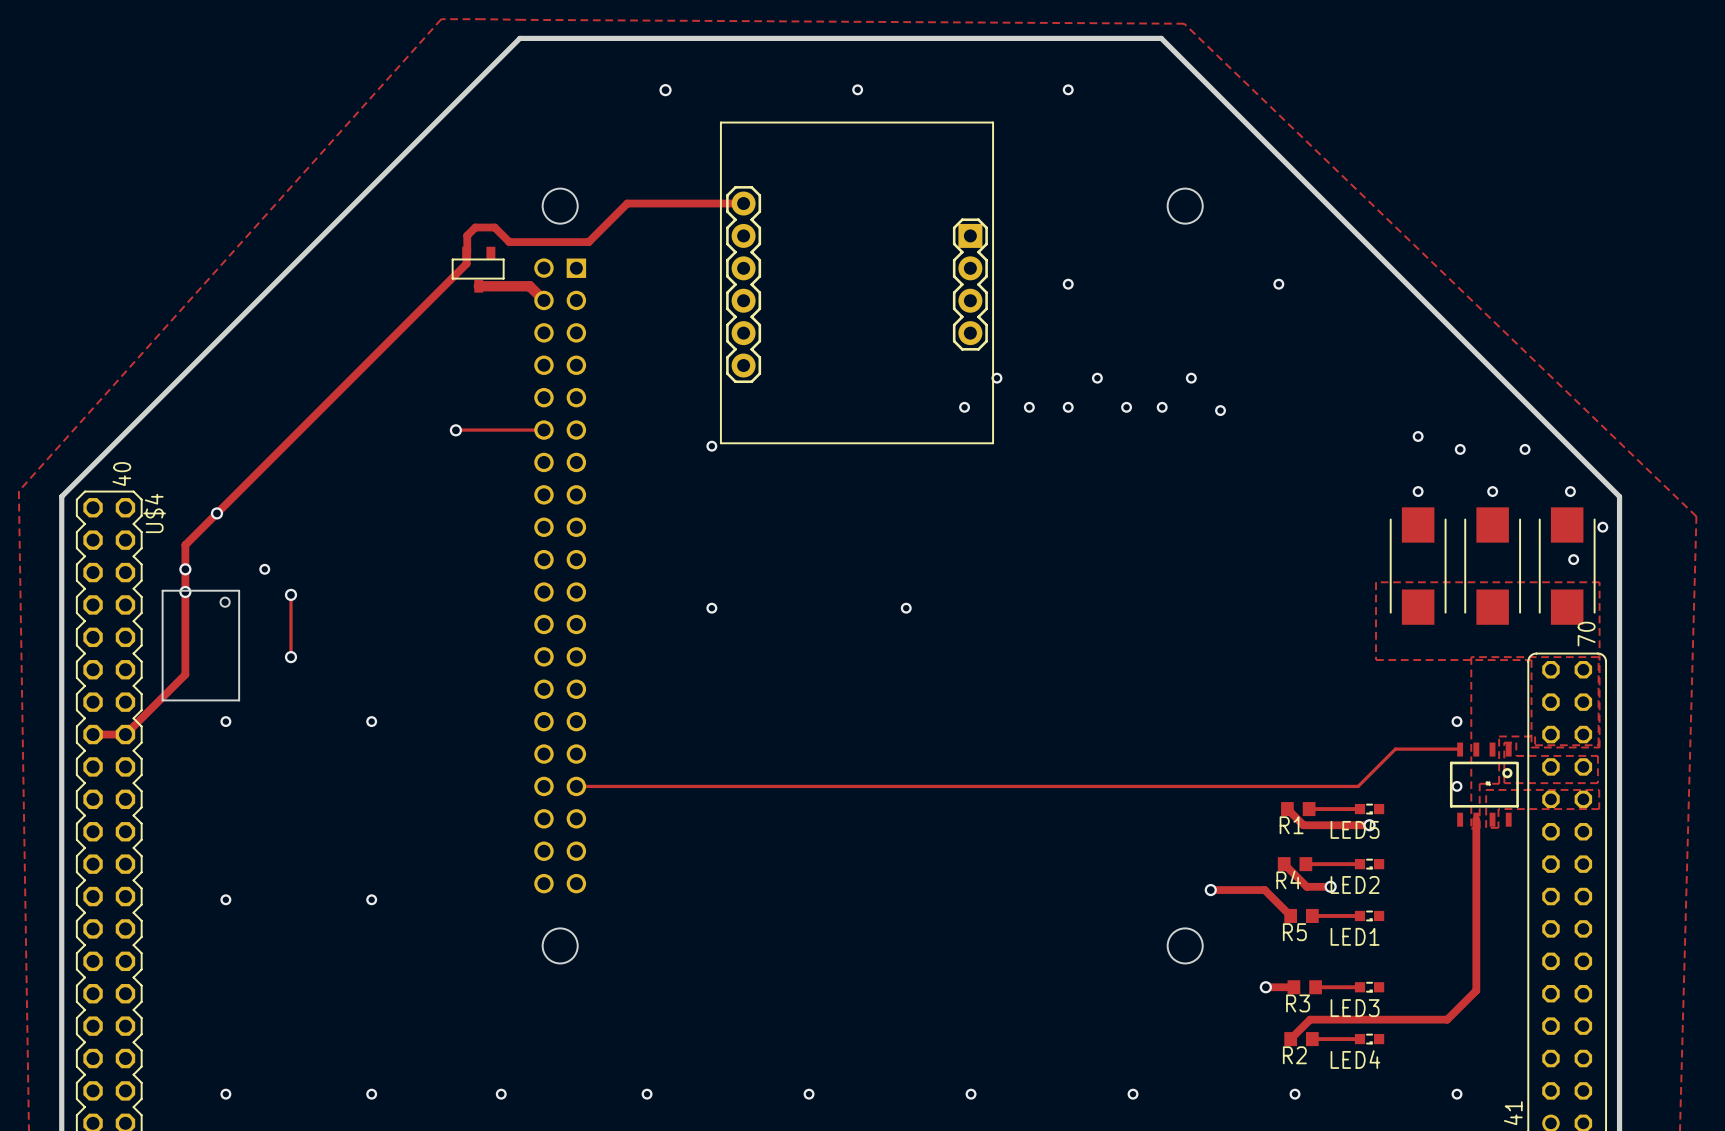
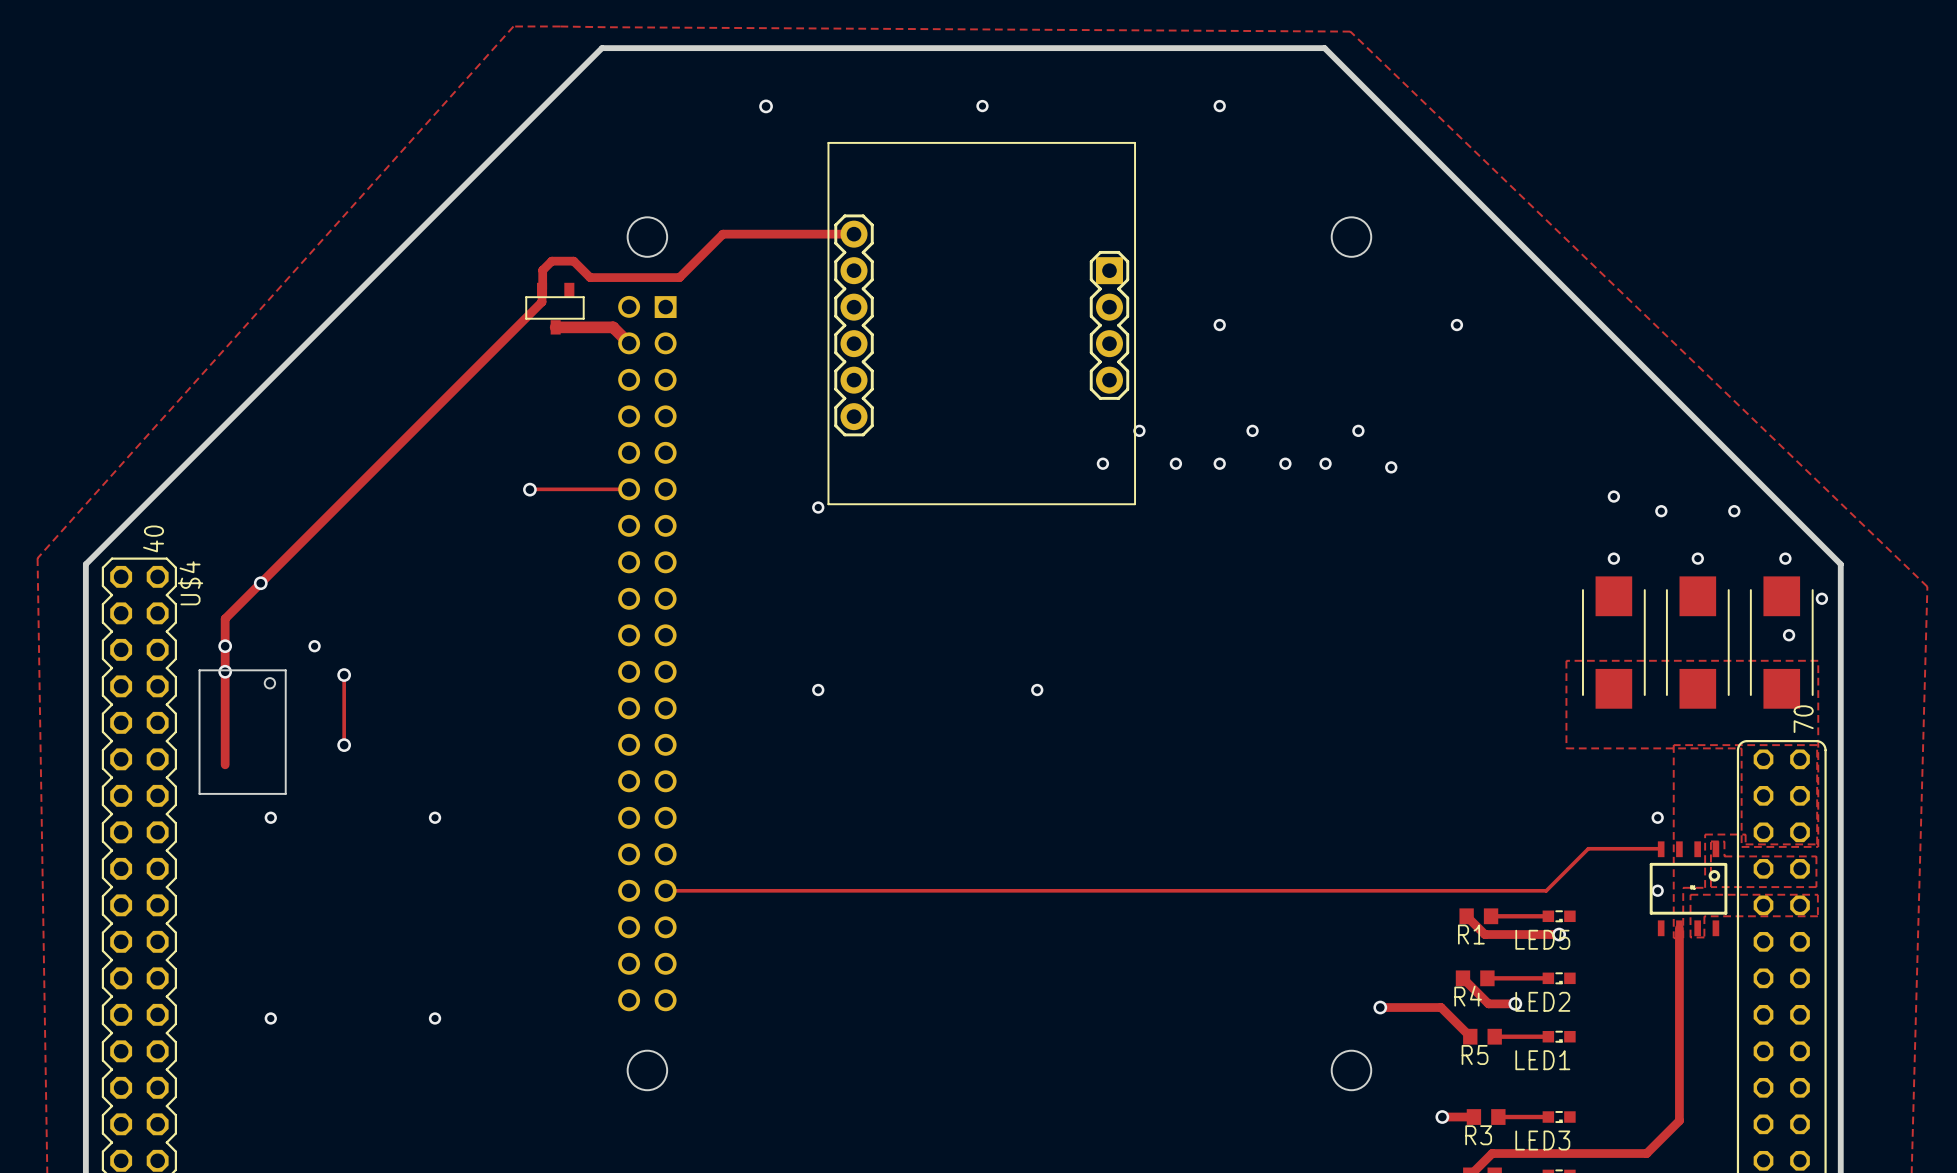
track: (185, 674) (125, 734) (93, 734) -> none

